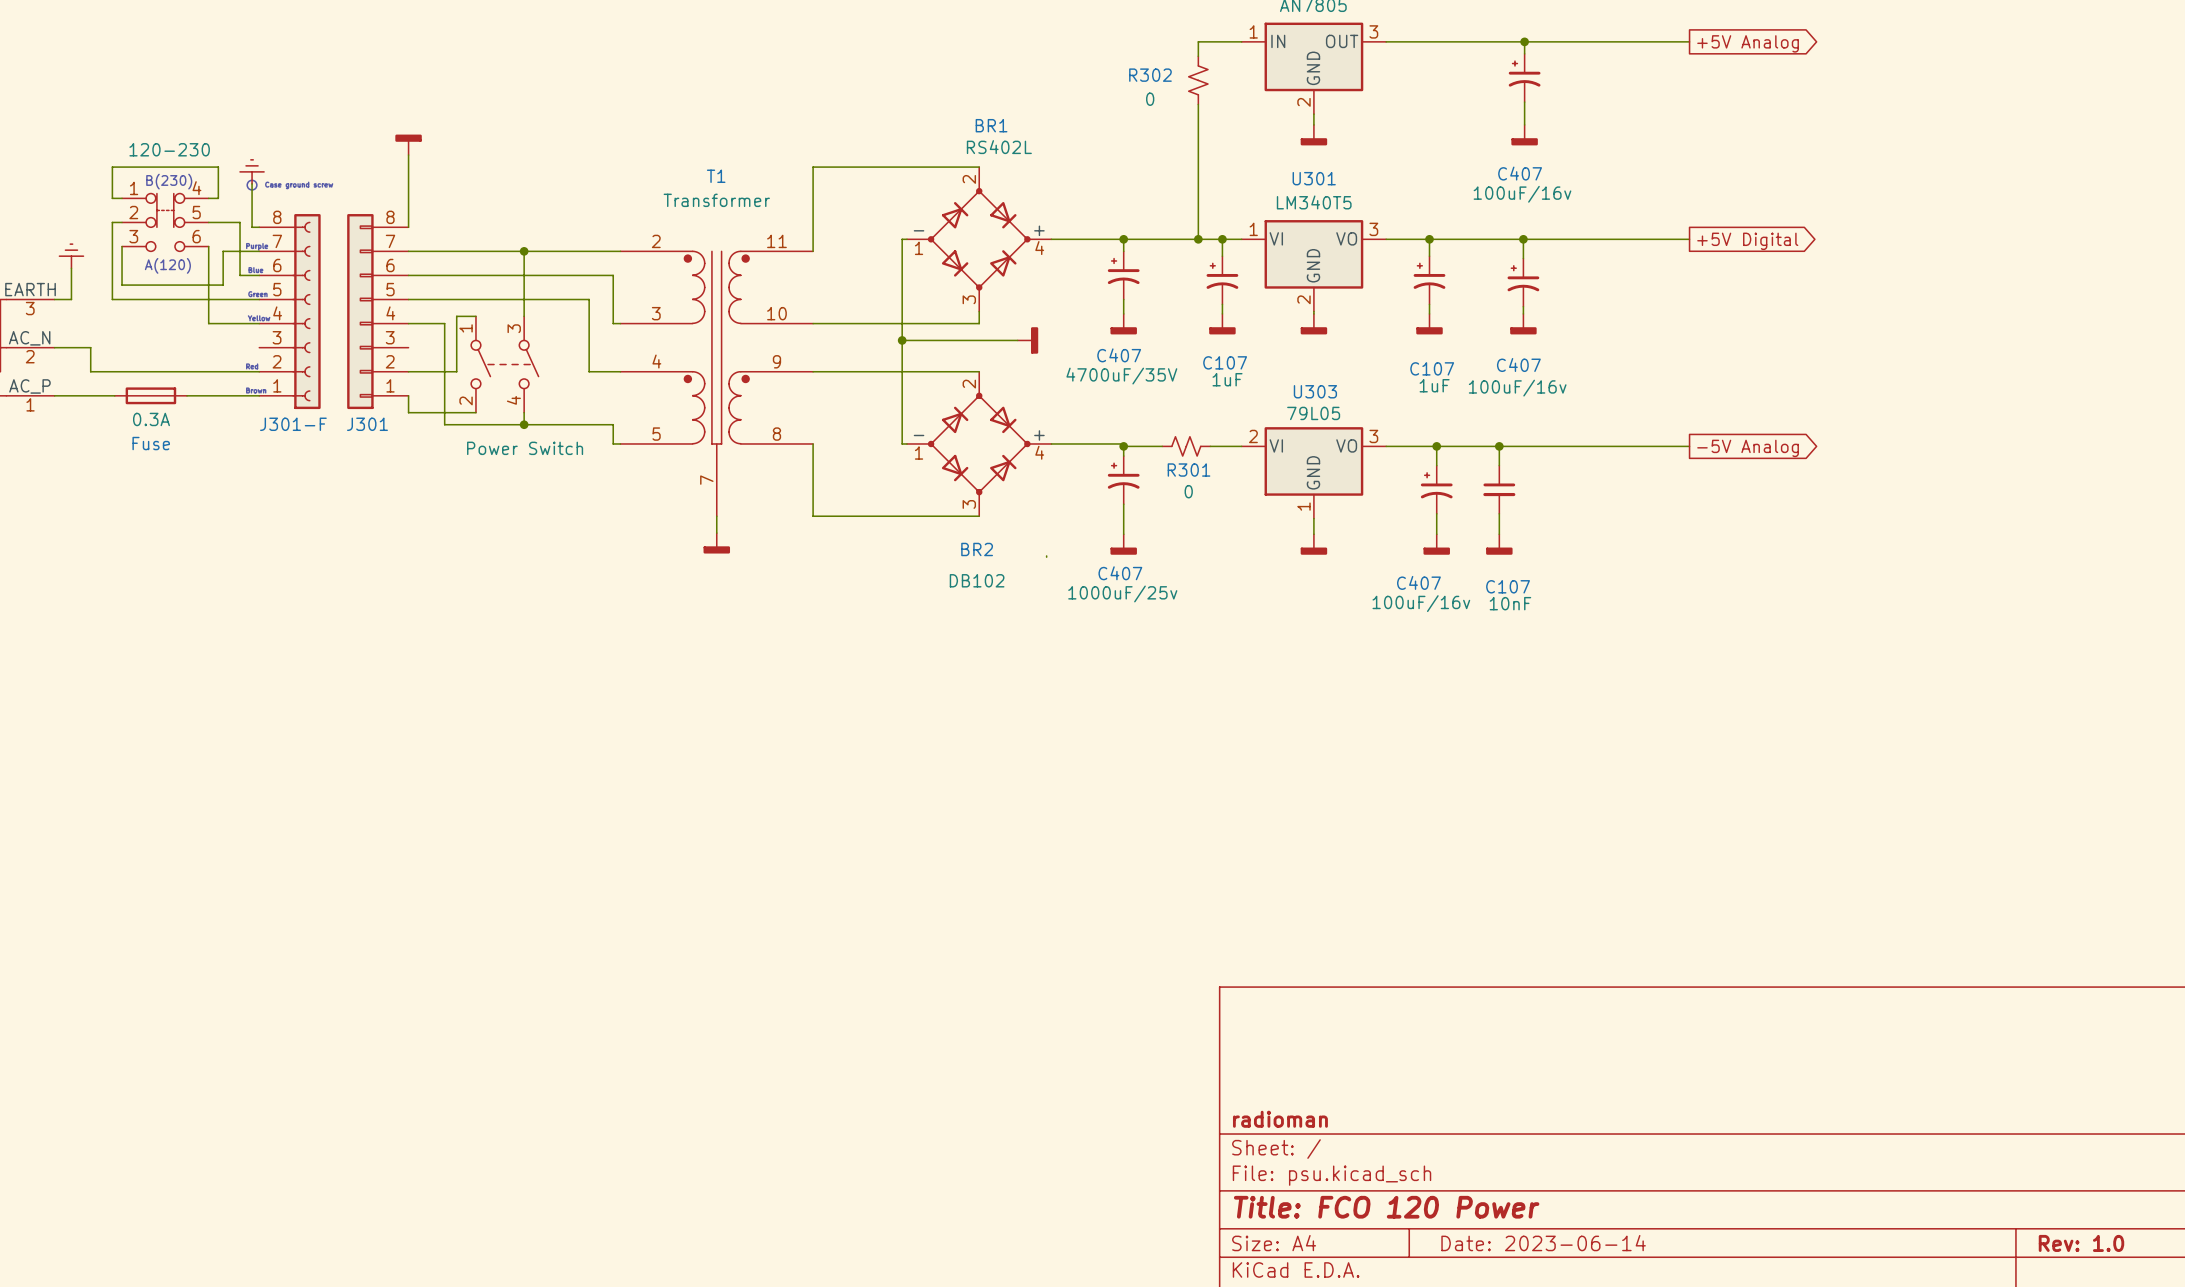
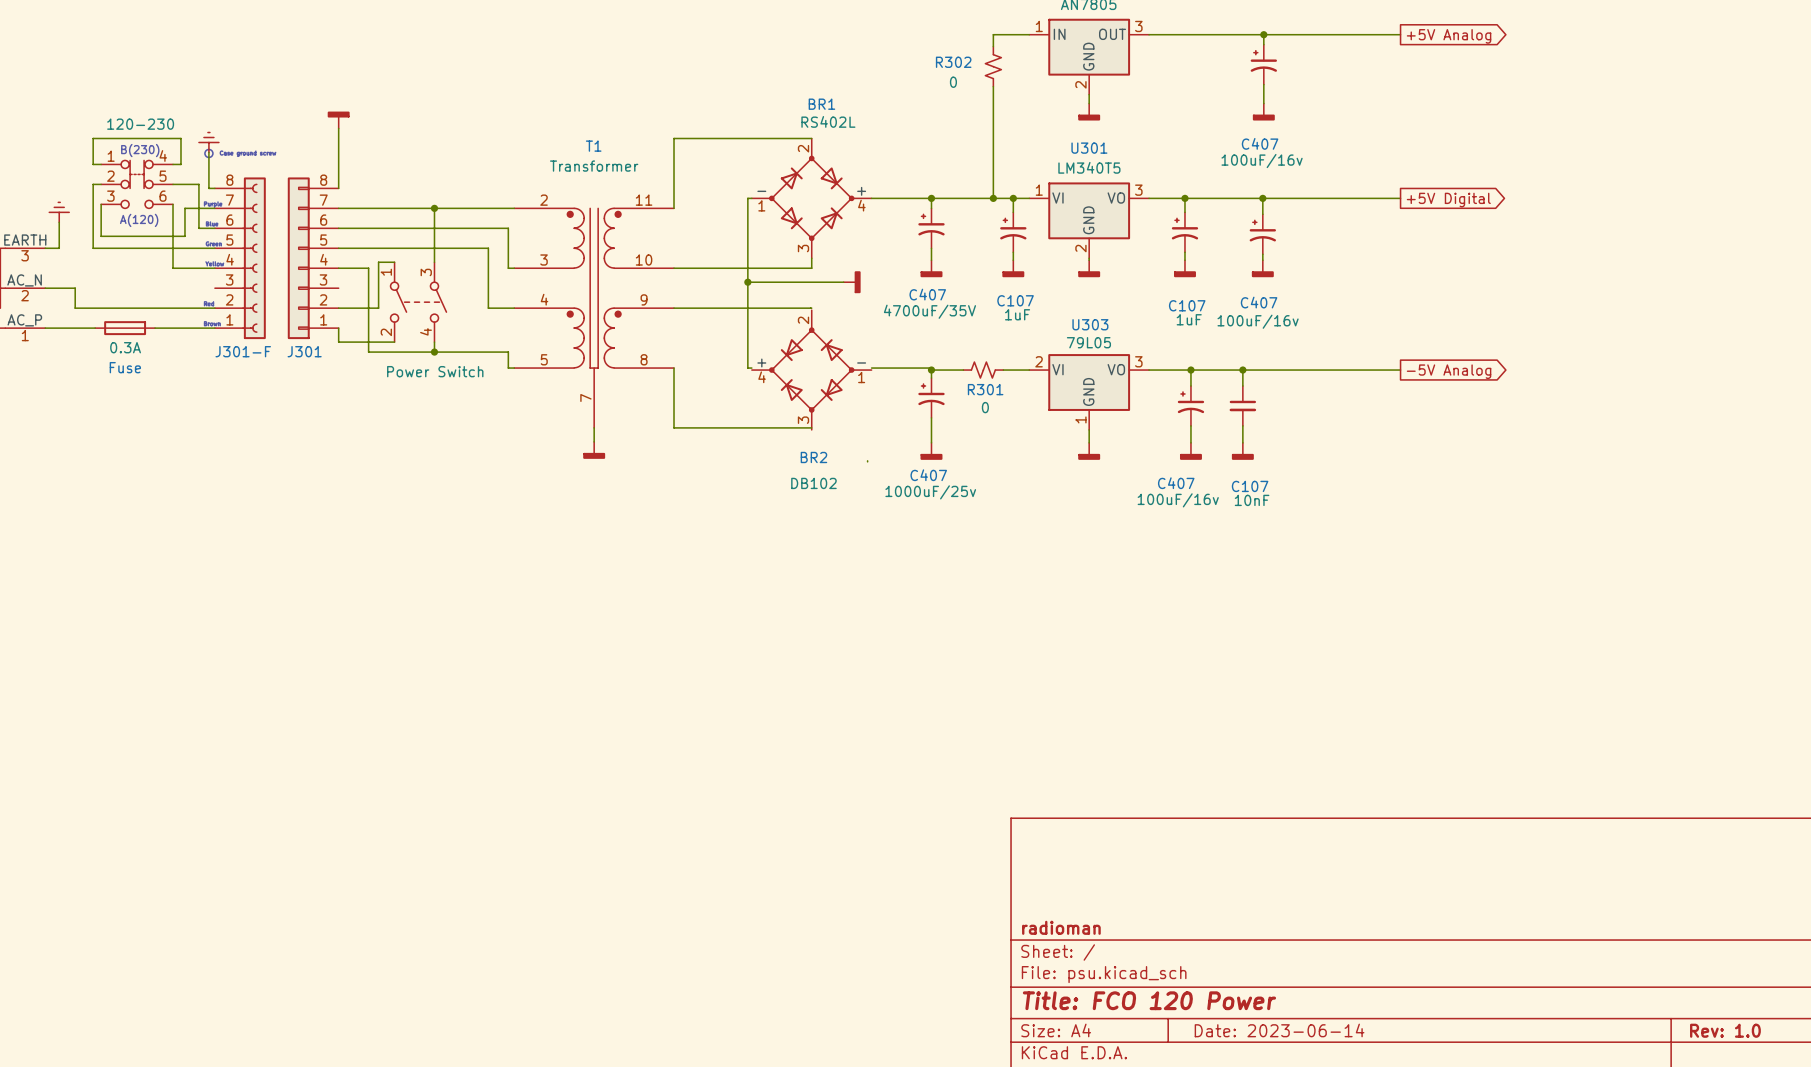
BR2 flip: as is (979, 443) -> left-right (811, 370)

